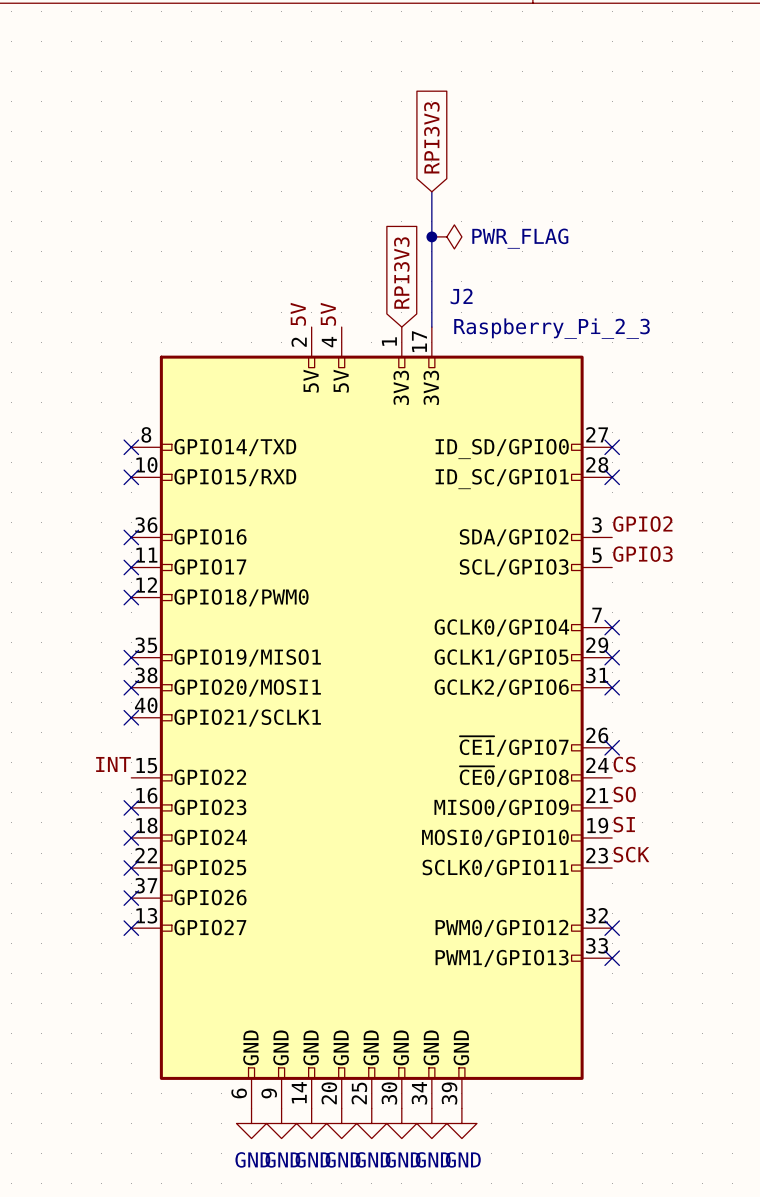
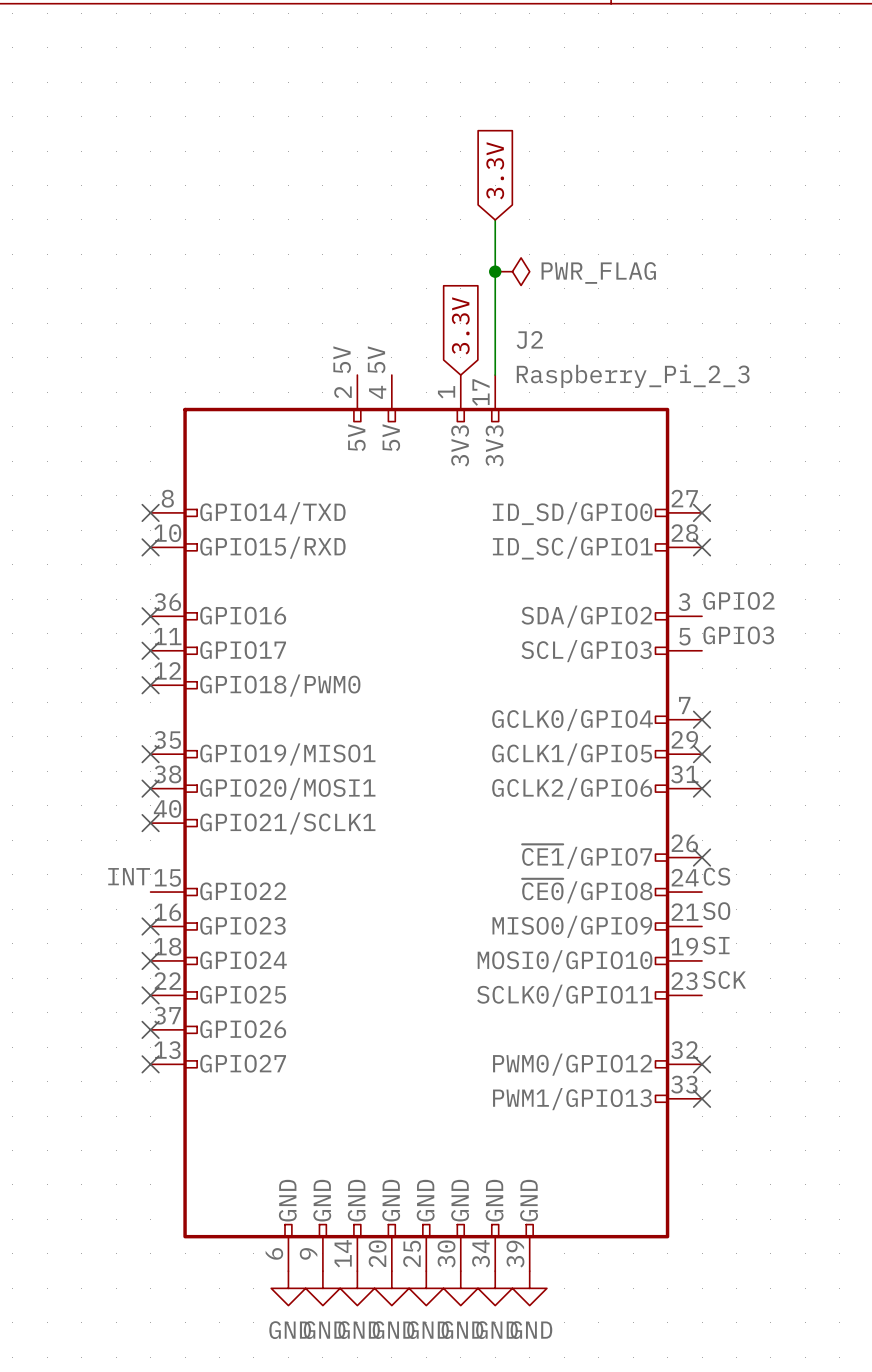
global label: RPI3V3 (431, 137) -> 3.3V (495, 170)
global label: RPI3V3 (401, 273) -> 3.3V (460, 325)

